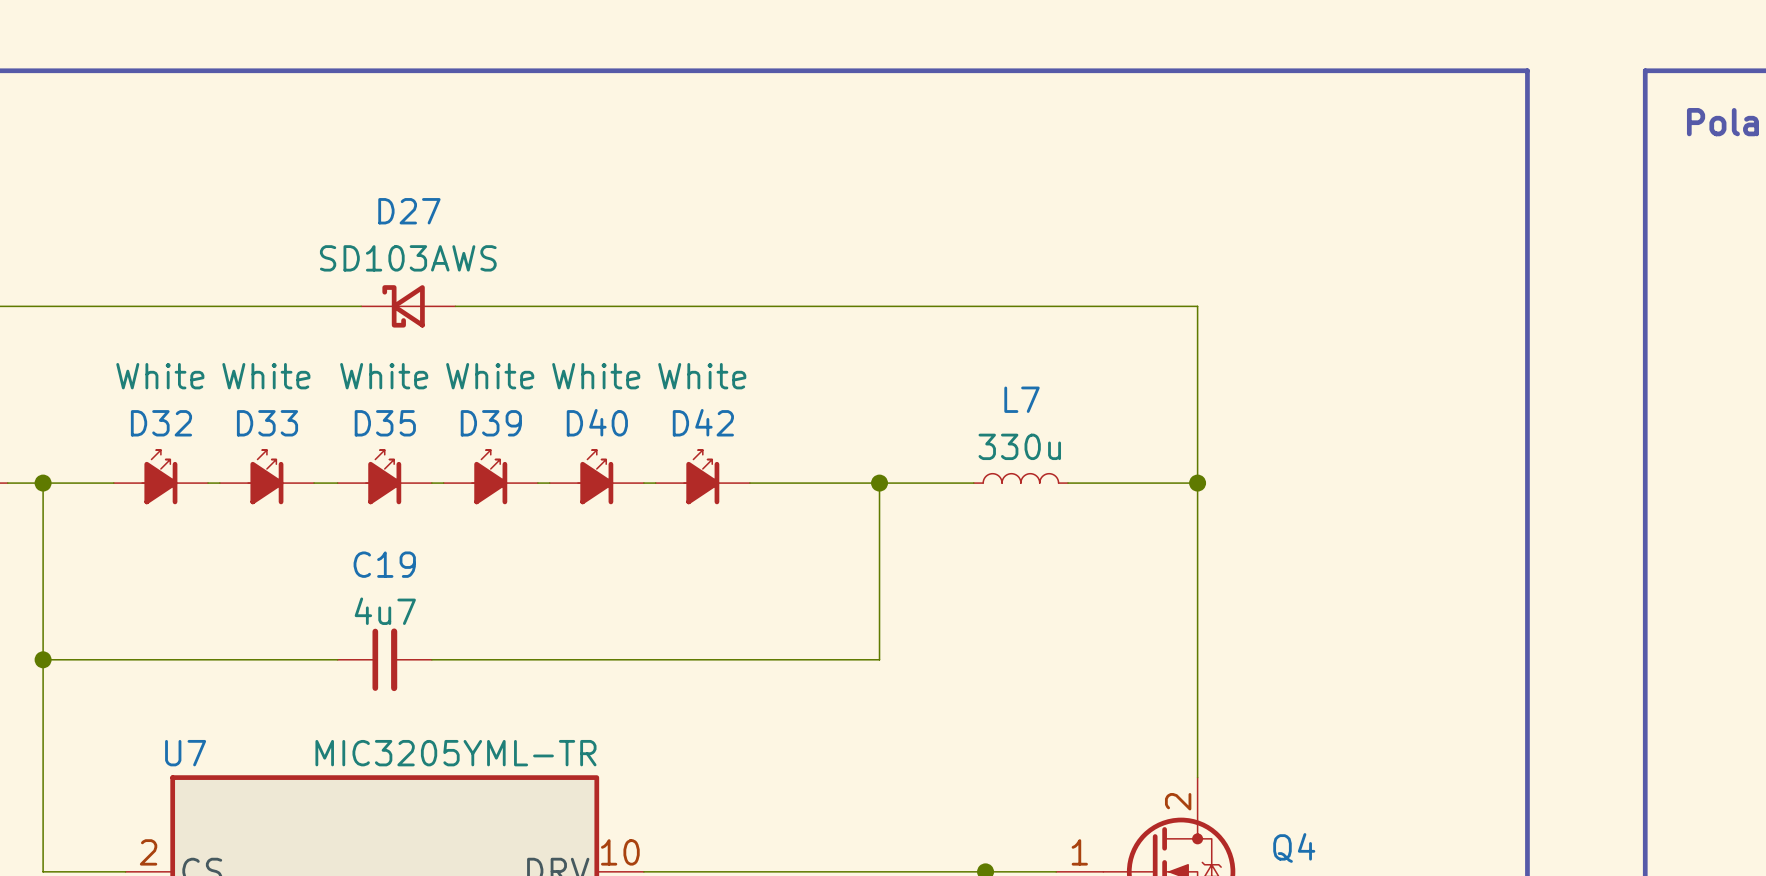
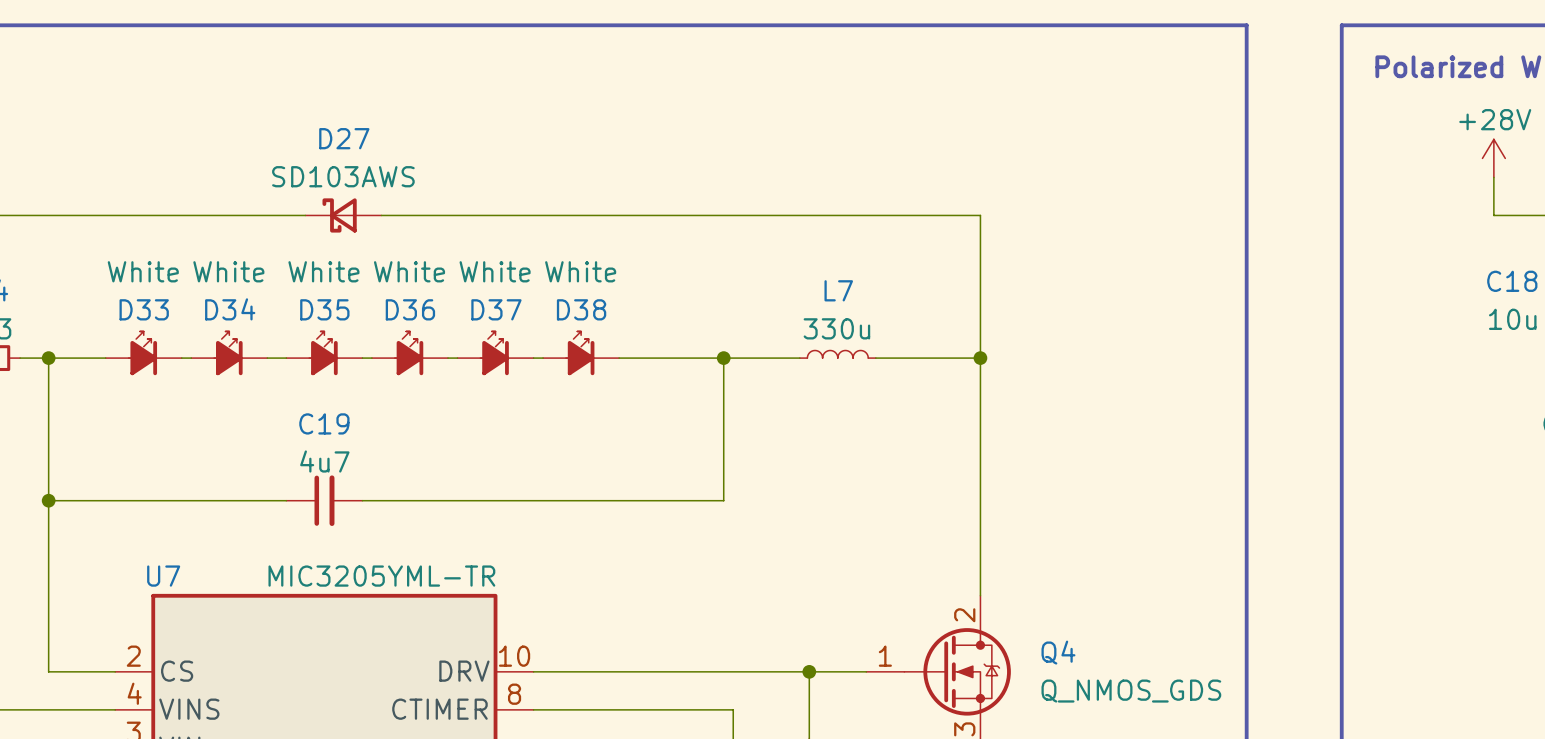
D40 name: D40 (597, 422) -> D37 (496, 309)
D42 name: D42 (703, 422) -> D38 (581, 309)
D32 name: D32 (161, 423) -> D33 (144, 309)
D33 name: D33 (267, 423) -> D34 (230, 309)
D39 name: D39 (491, 423) -> D36 (410, 309)

